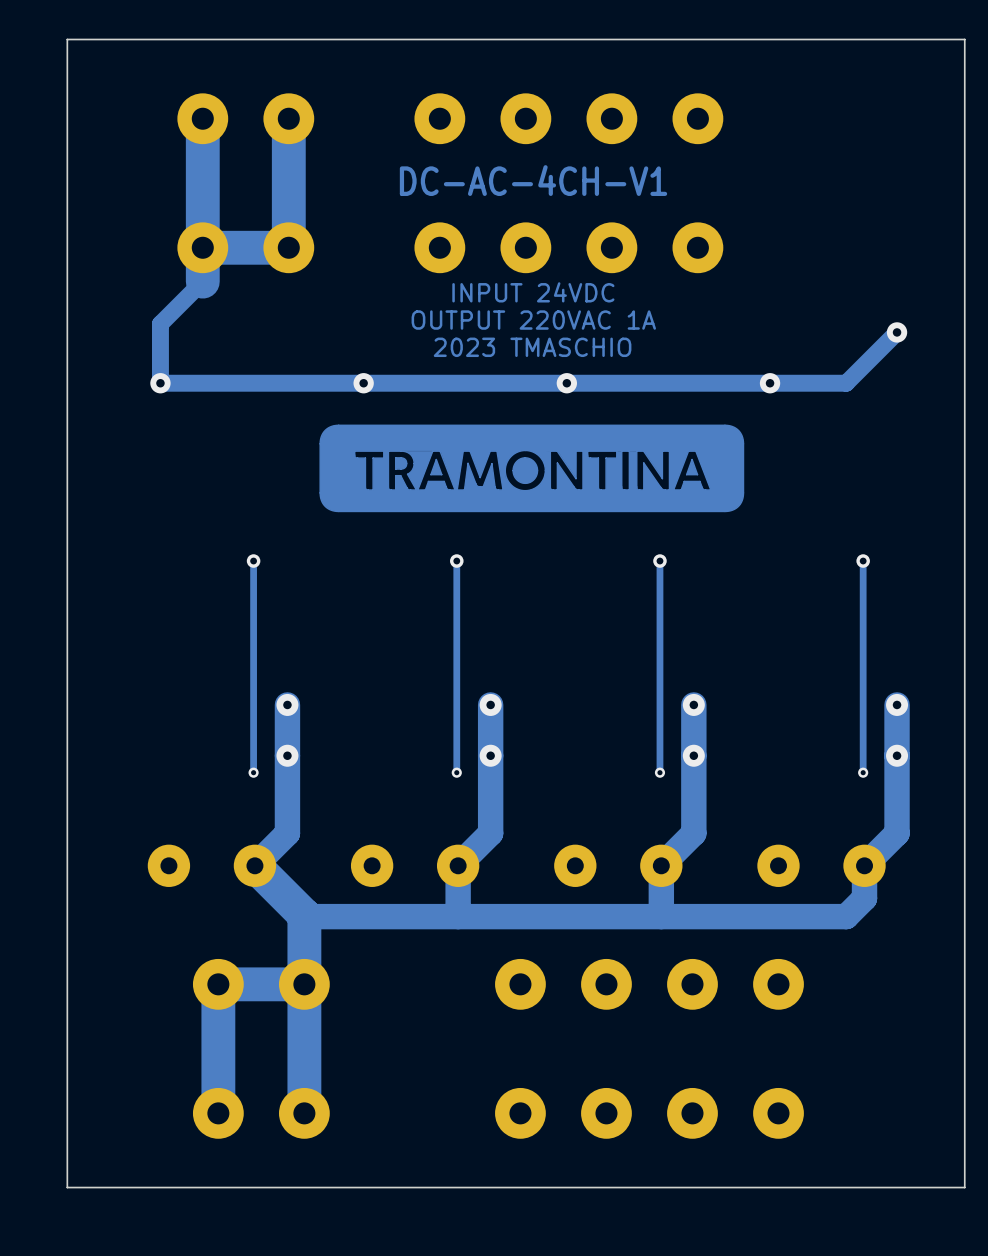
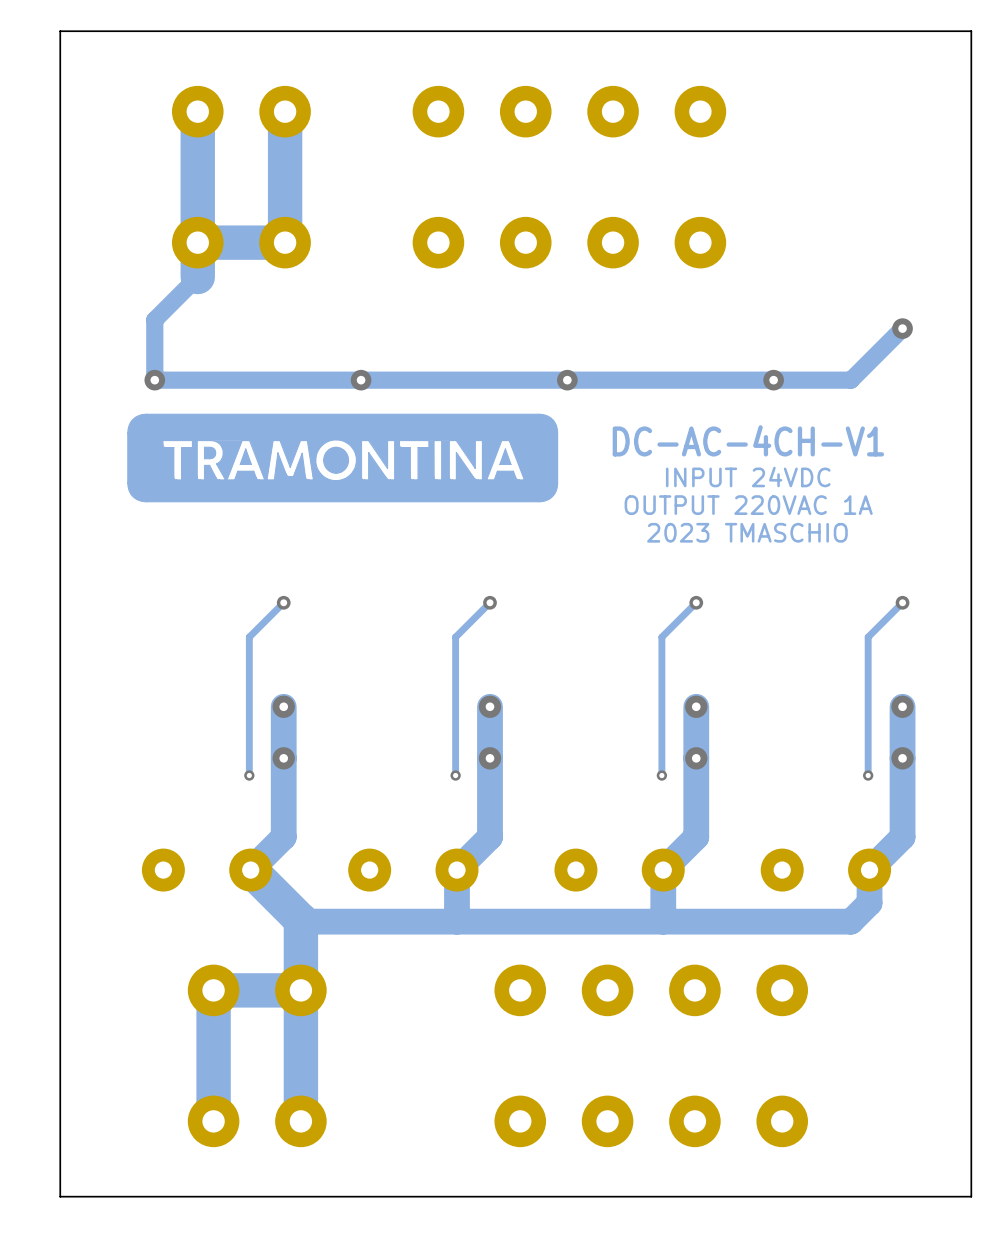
text position: DC-AC-4CH-V1 (533, 180) -> DC-AC-4CH-V1 (748, 440)
text position: INPUT 24VDC (533, 292) -> INPUT 24VDC (748, 477)
text position: OUTPUT 220VAC 1A (533, 320) -> OUTPUT 220VAC 1A (748, 505)
text position: 2023 TMASCHIO (532, 347) -> 2023 TMASCHIO (747, 532)
drawing position: (531, 468) -> (342, 458)
track: (253, 561) (253, 636) -> (283, 602) (249, 637)
via position: (253, 561) -> (283, 602)
track: (456, 561) (456, 636) -> (489, 602) (455, 637)
via position: (456, 561) -> (489, 602)
track: (659, 561) (659, 636) -> (696, 602) (661, 637)
via position: (659, 561) -> (696, 602)
track: (863, 561) (863, 636) -> (902, 602) (868, 637)
via position: (863, 561) -> (902, 602)

